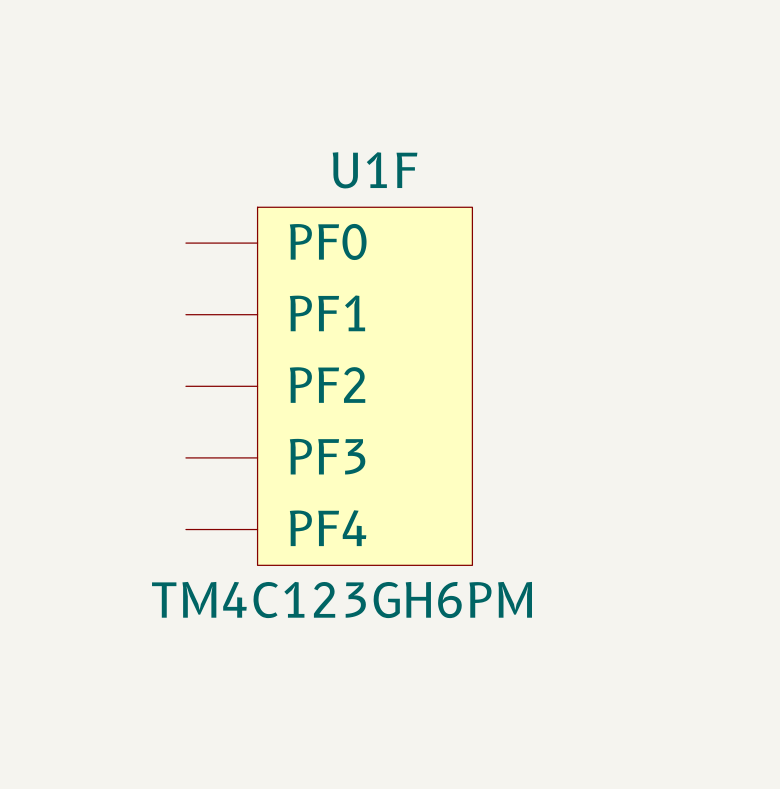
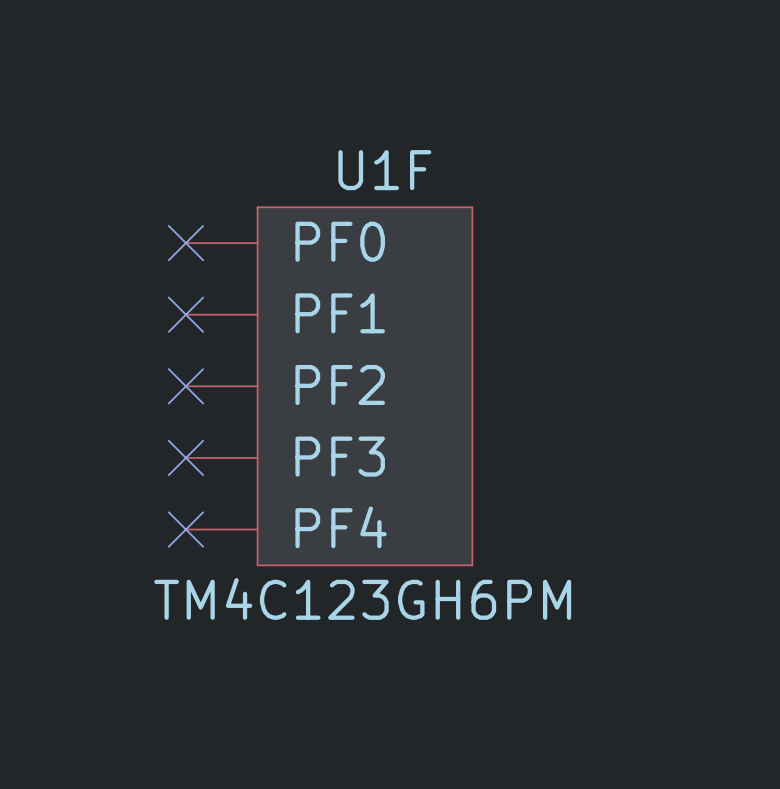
no-connect mark: none -> (185, 243)
no-connect mark: none -> (185, 314)
no-connect mark: none -> (185, 386)
no-connect mark: none -> (185, 457)
no-connect mark: none -> (185, 529)

